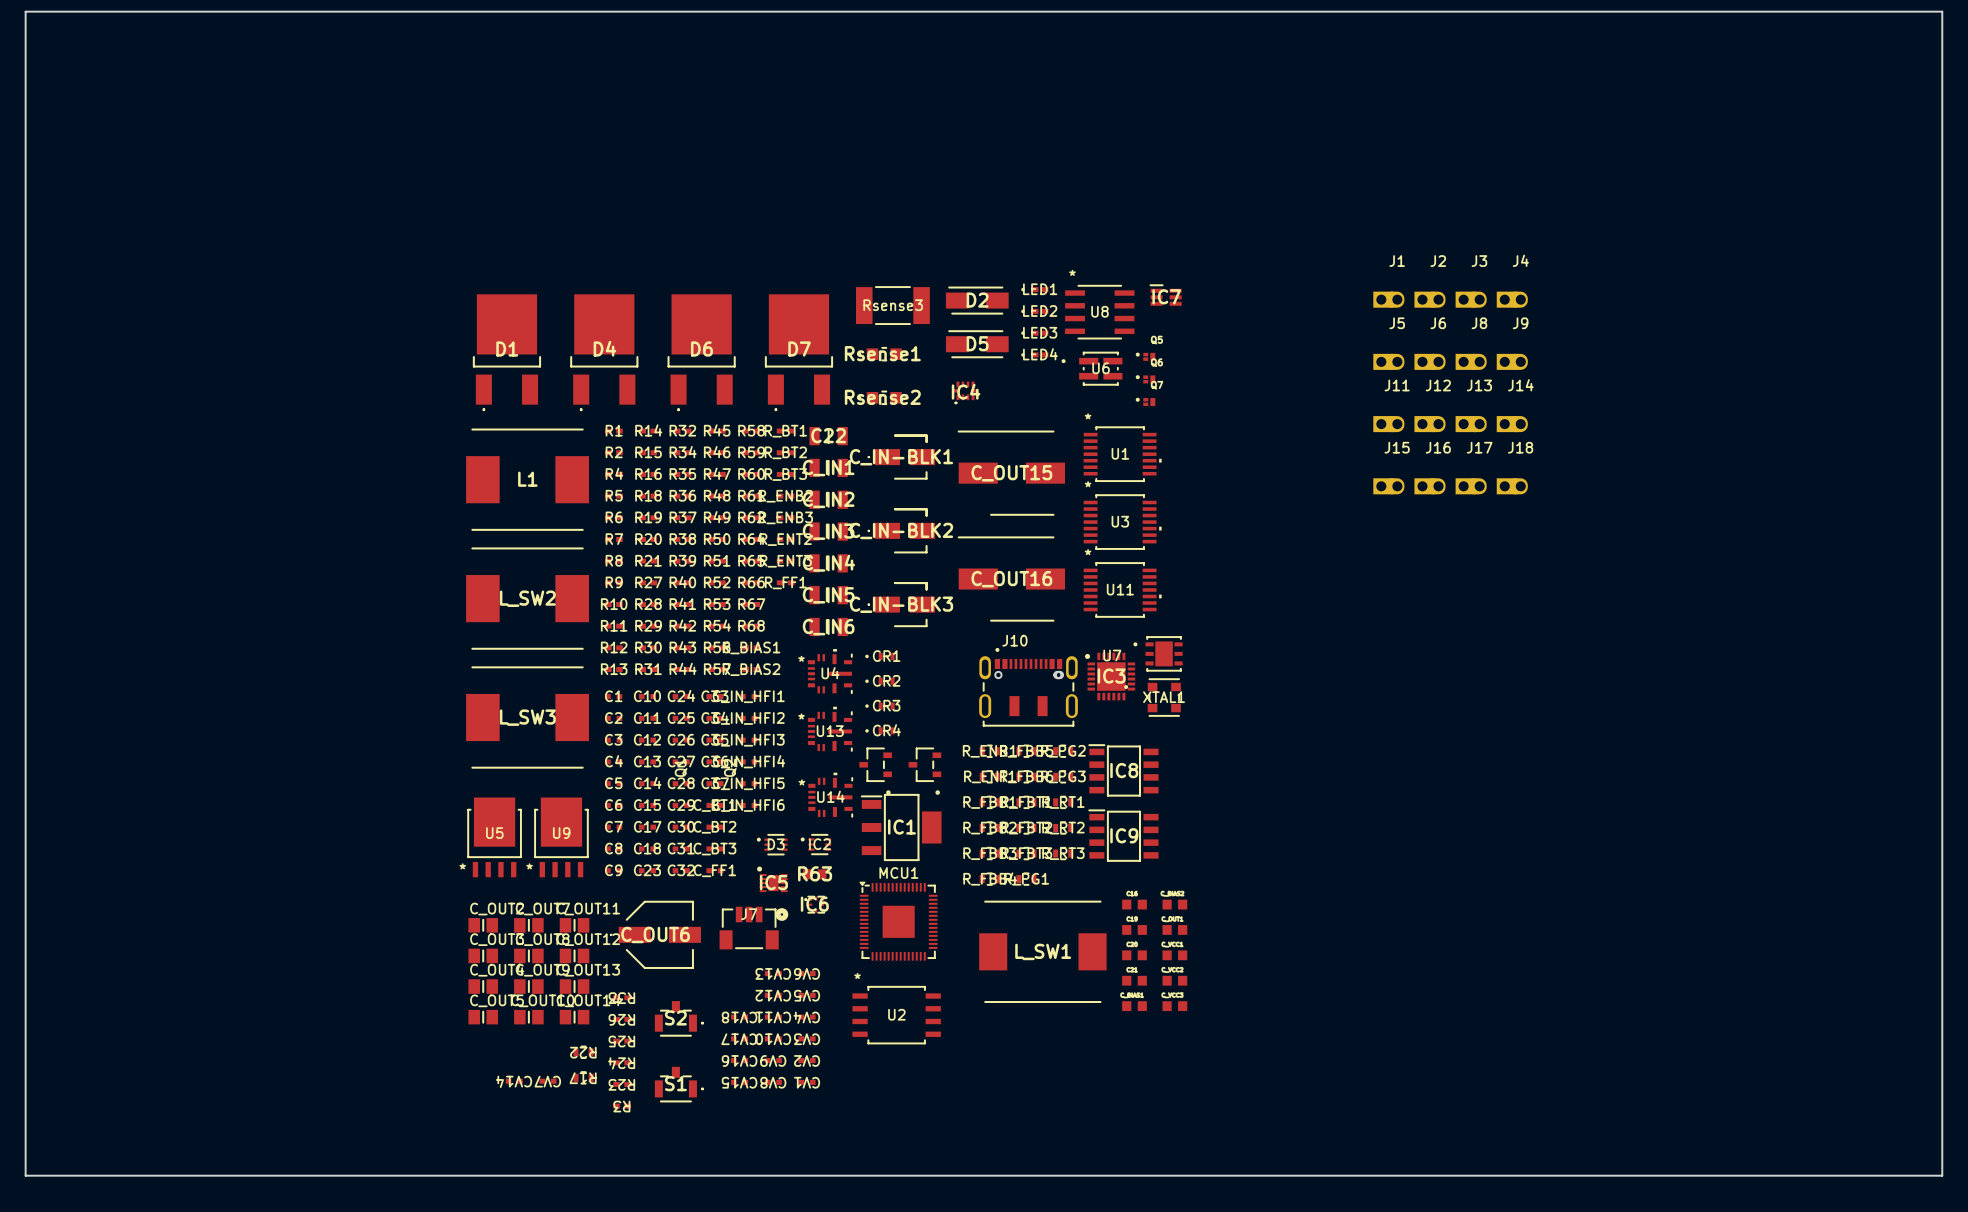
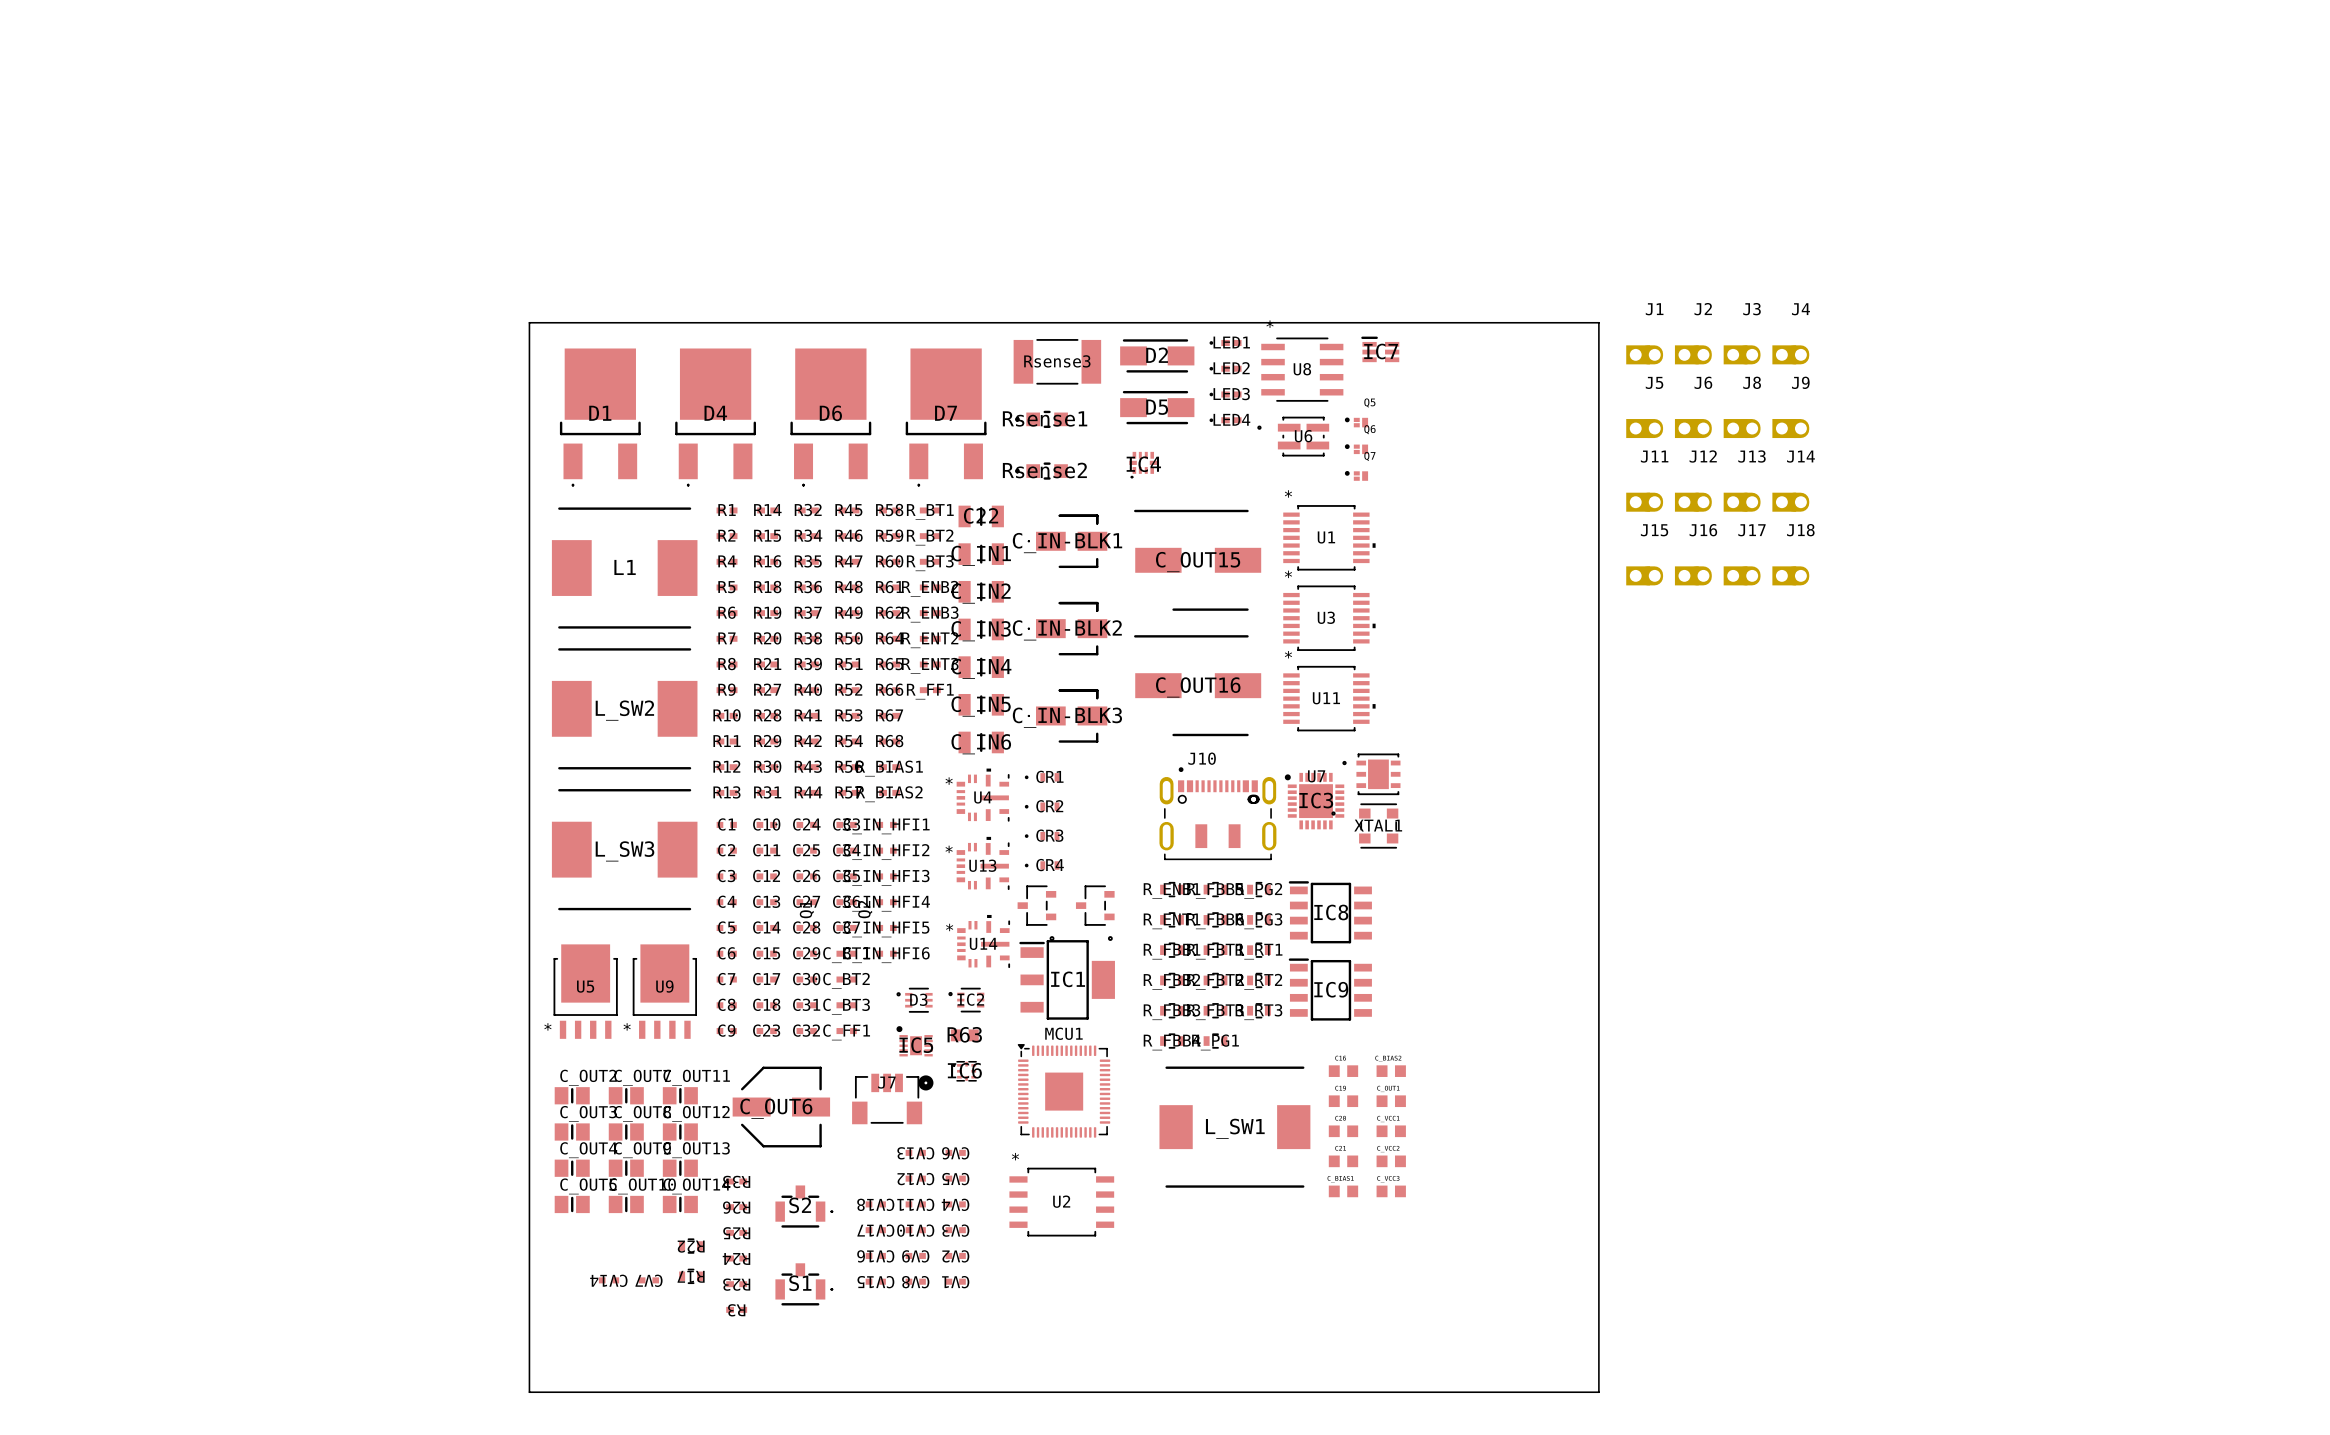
board edge: (447, 1175) (25, 1175) (25, 11) (1942, 11) (1942, 1175) (1350, 1175) -> (529, 1392) (529, 322) (1598, 322) (1598, 1392)

